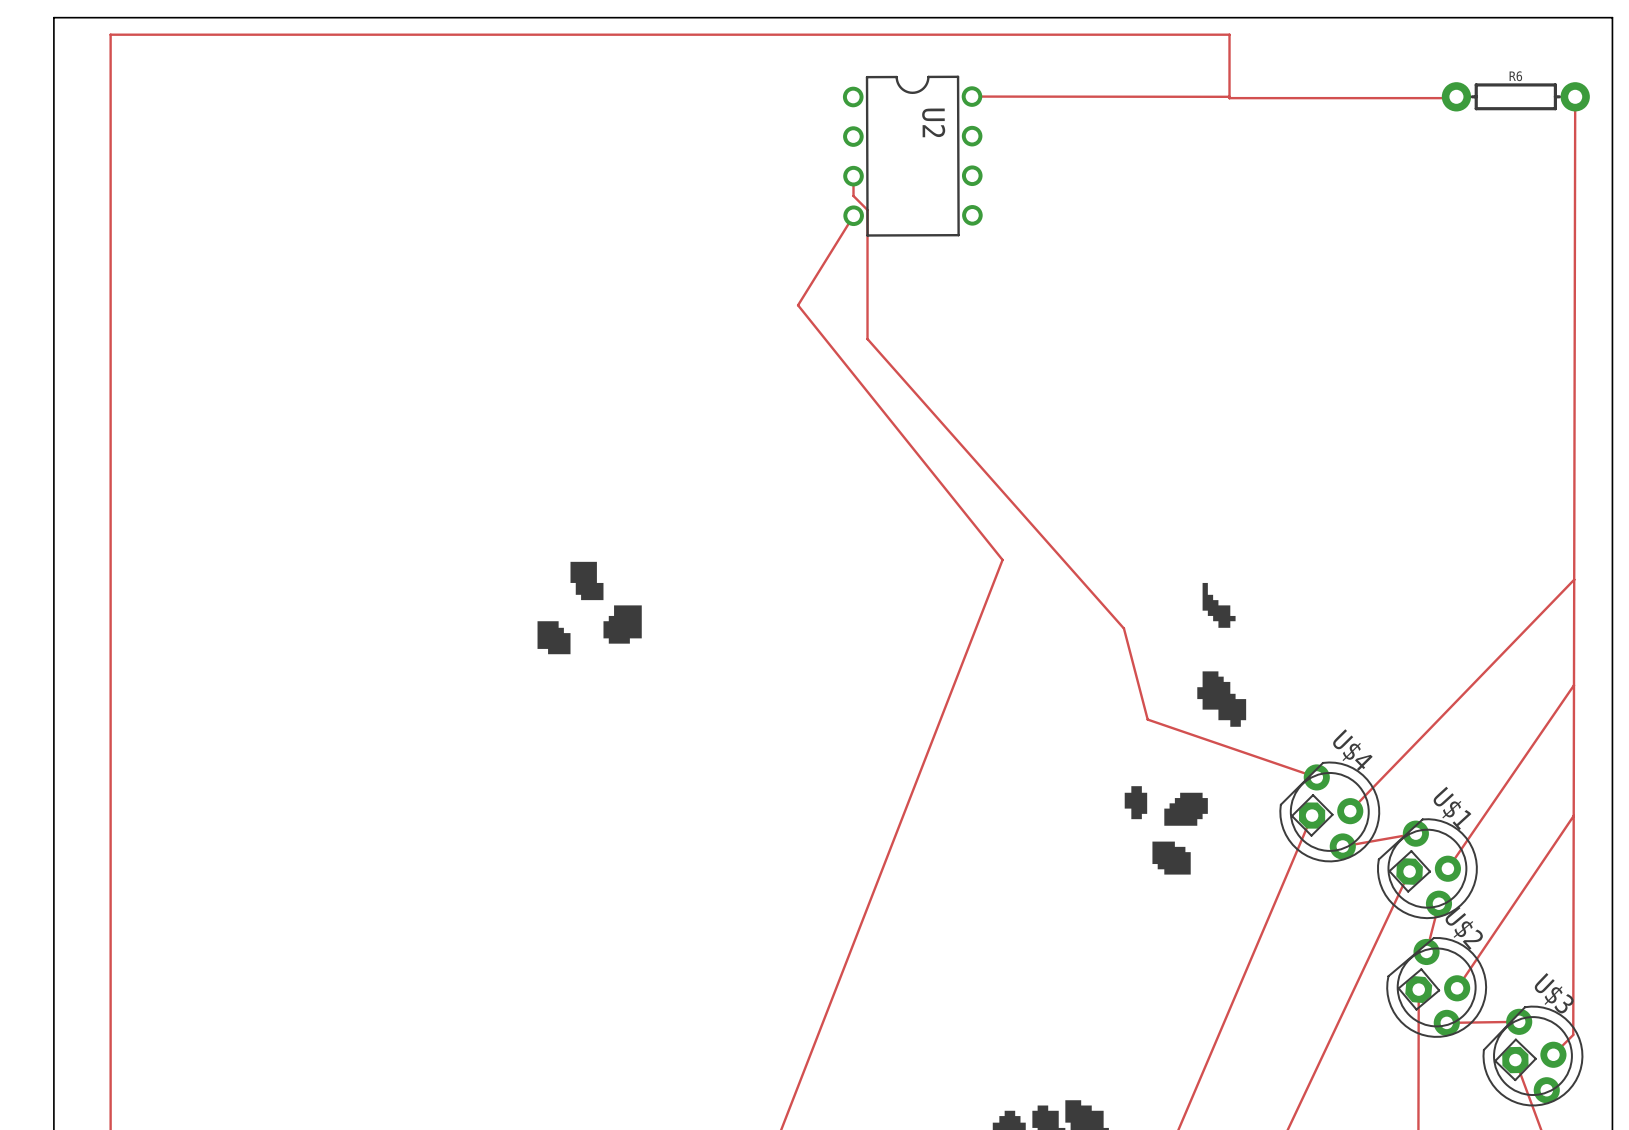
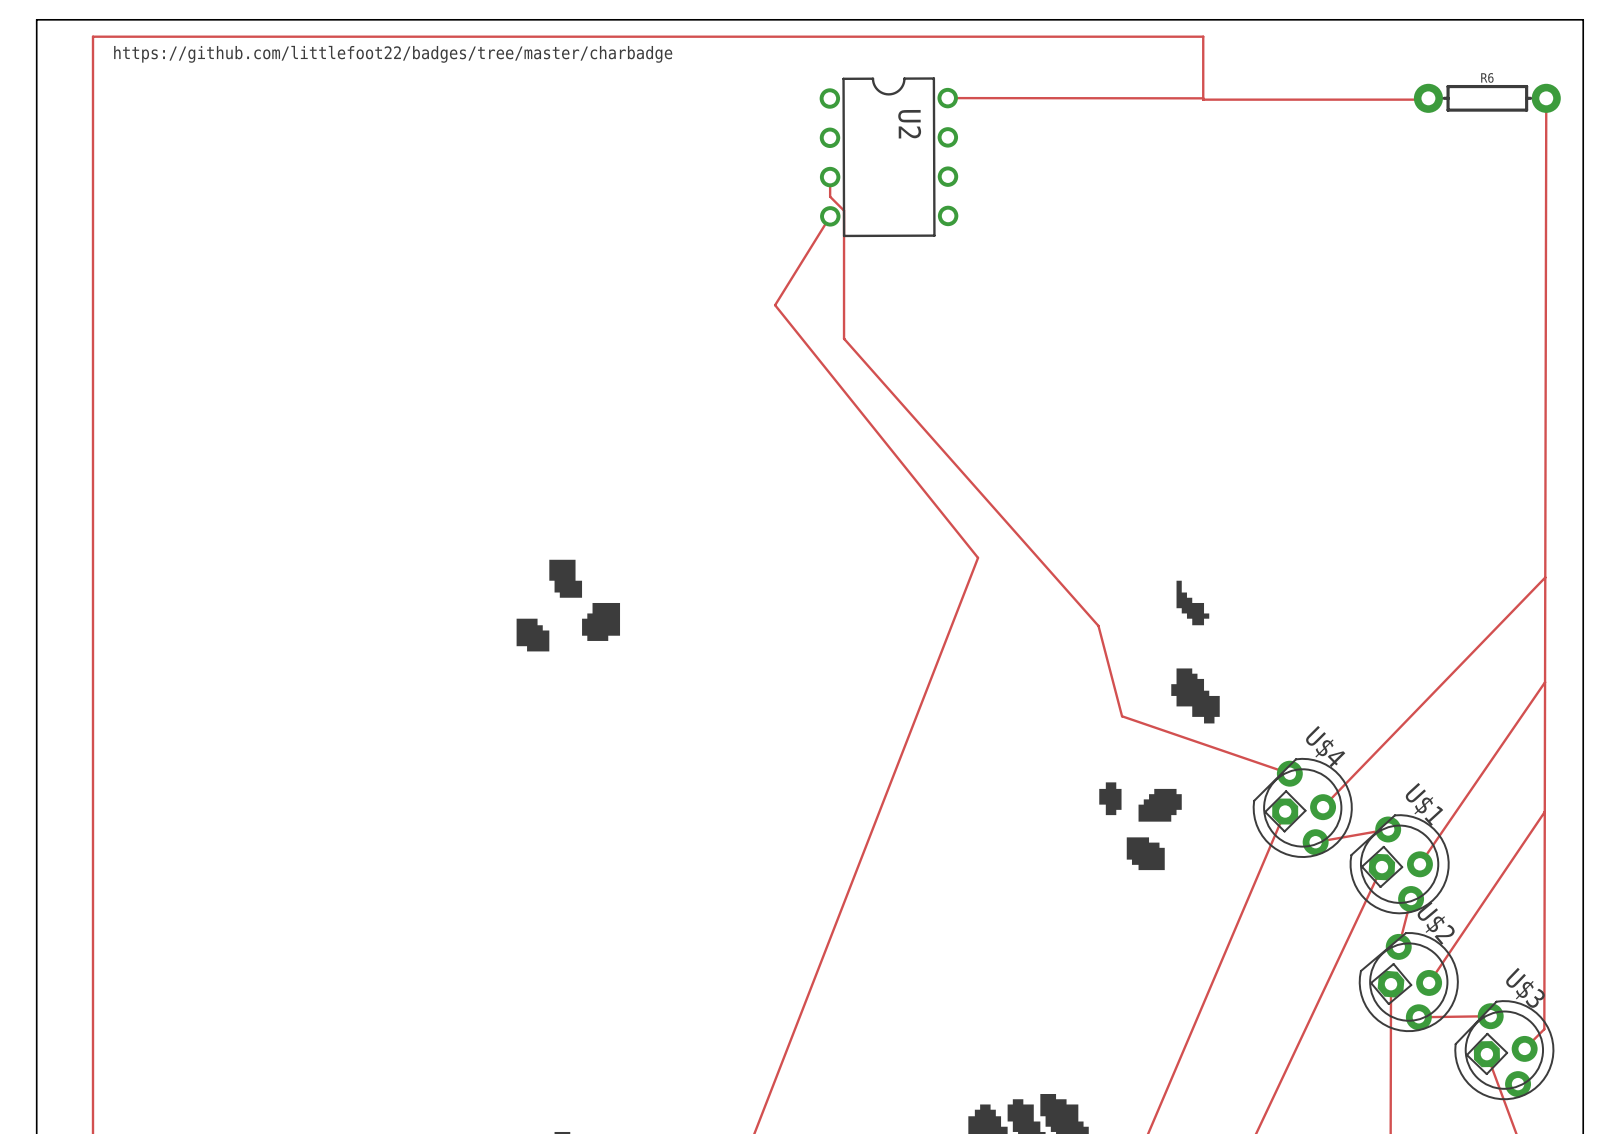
text: none -> https://github.com/littlefoot22/badges/tree/master/charbadge (393, 54)

